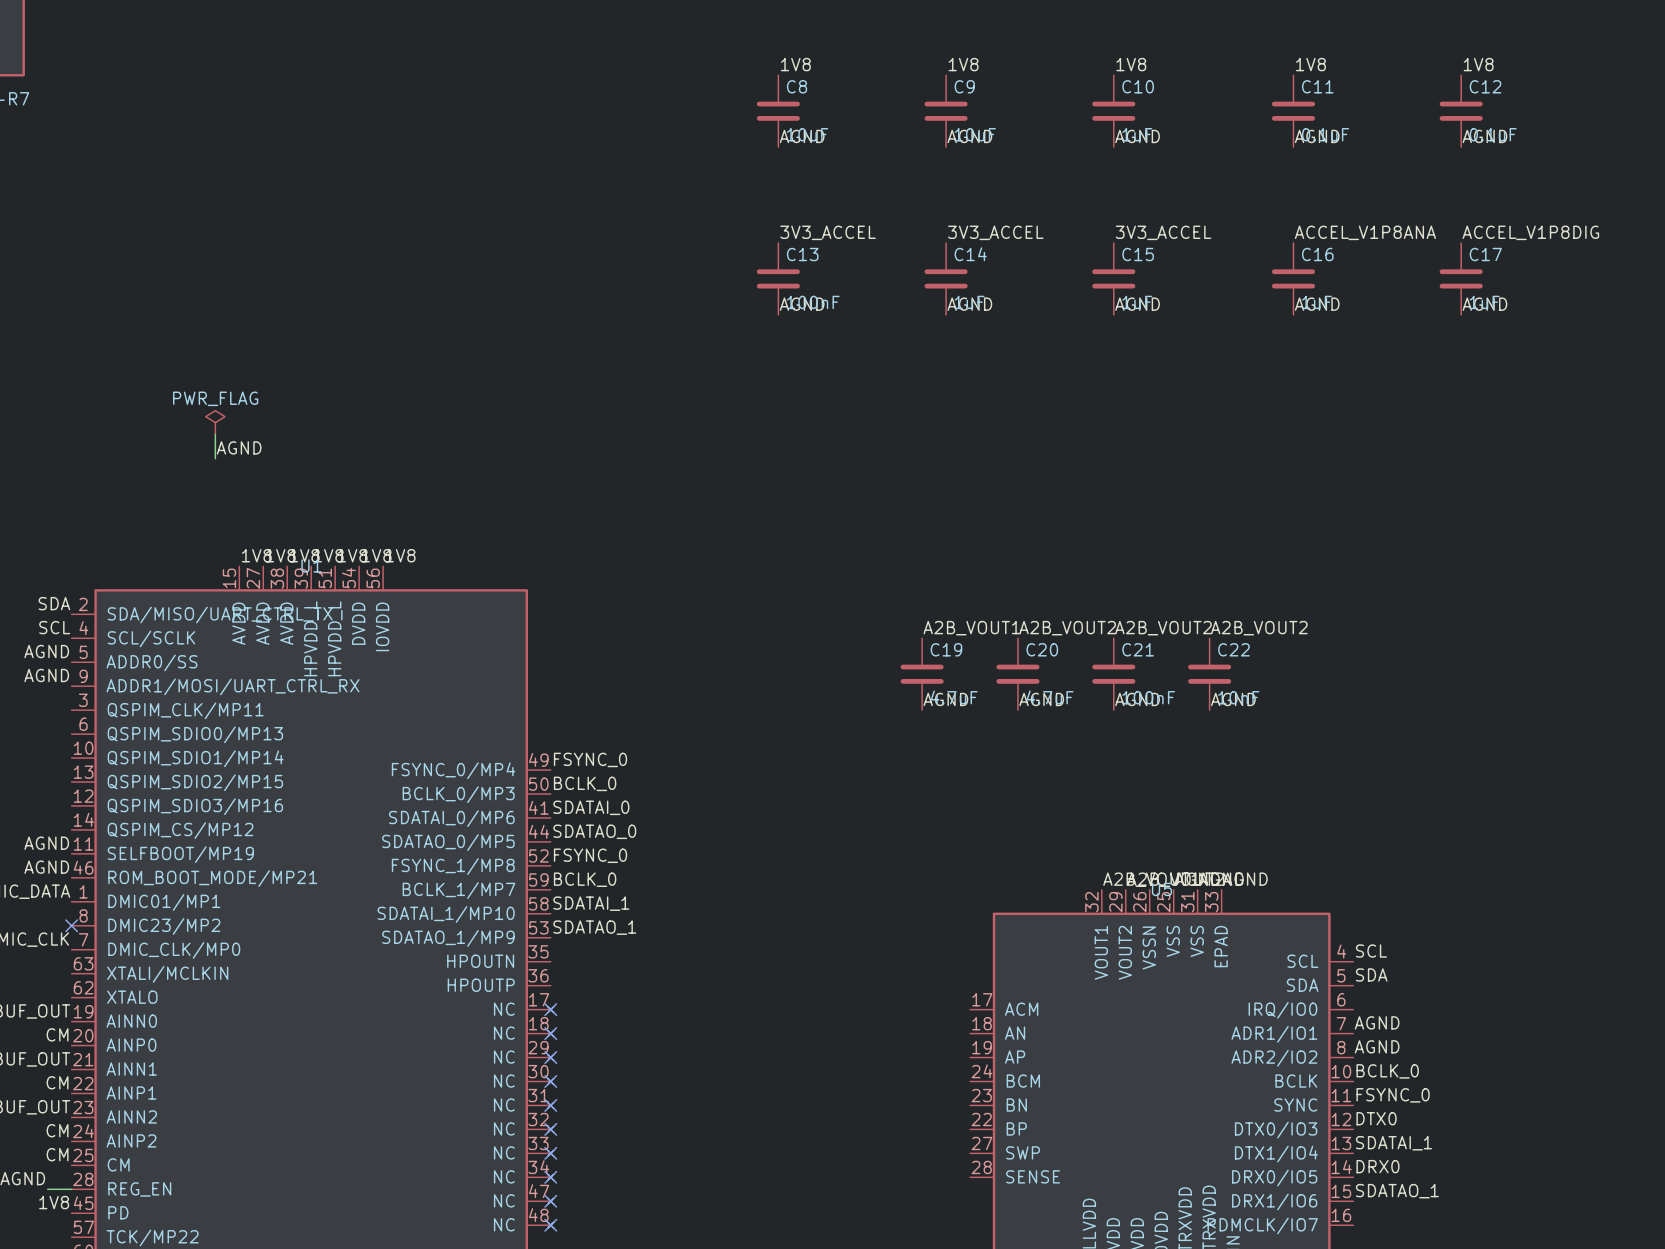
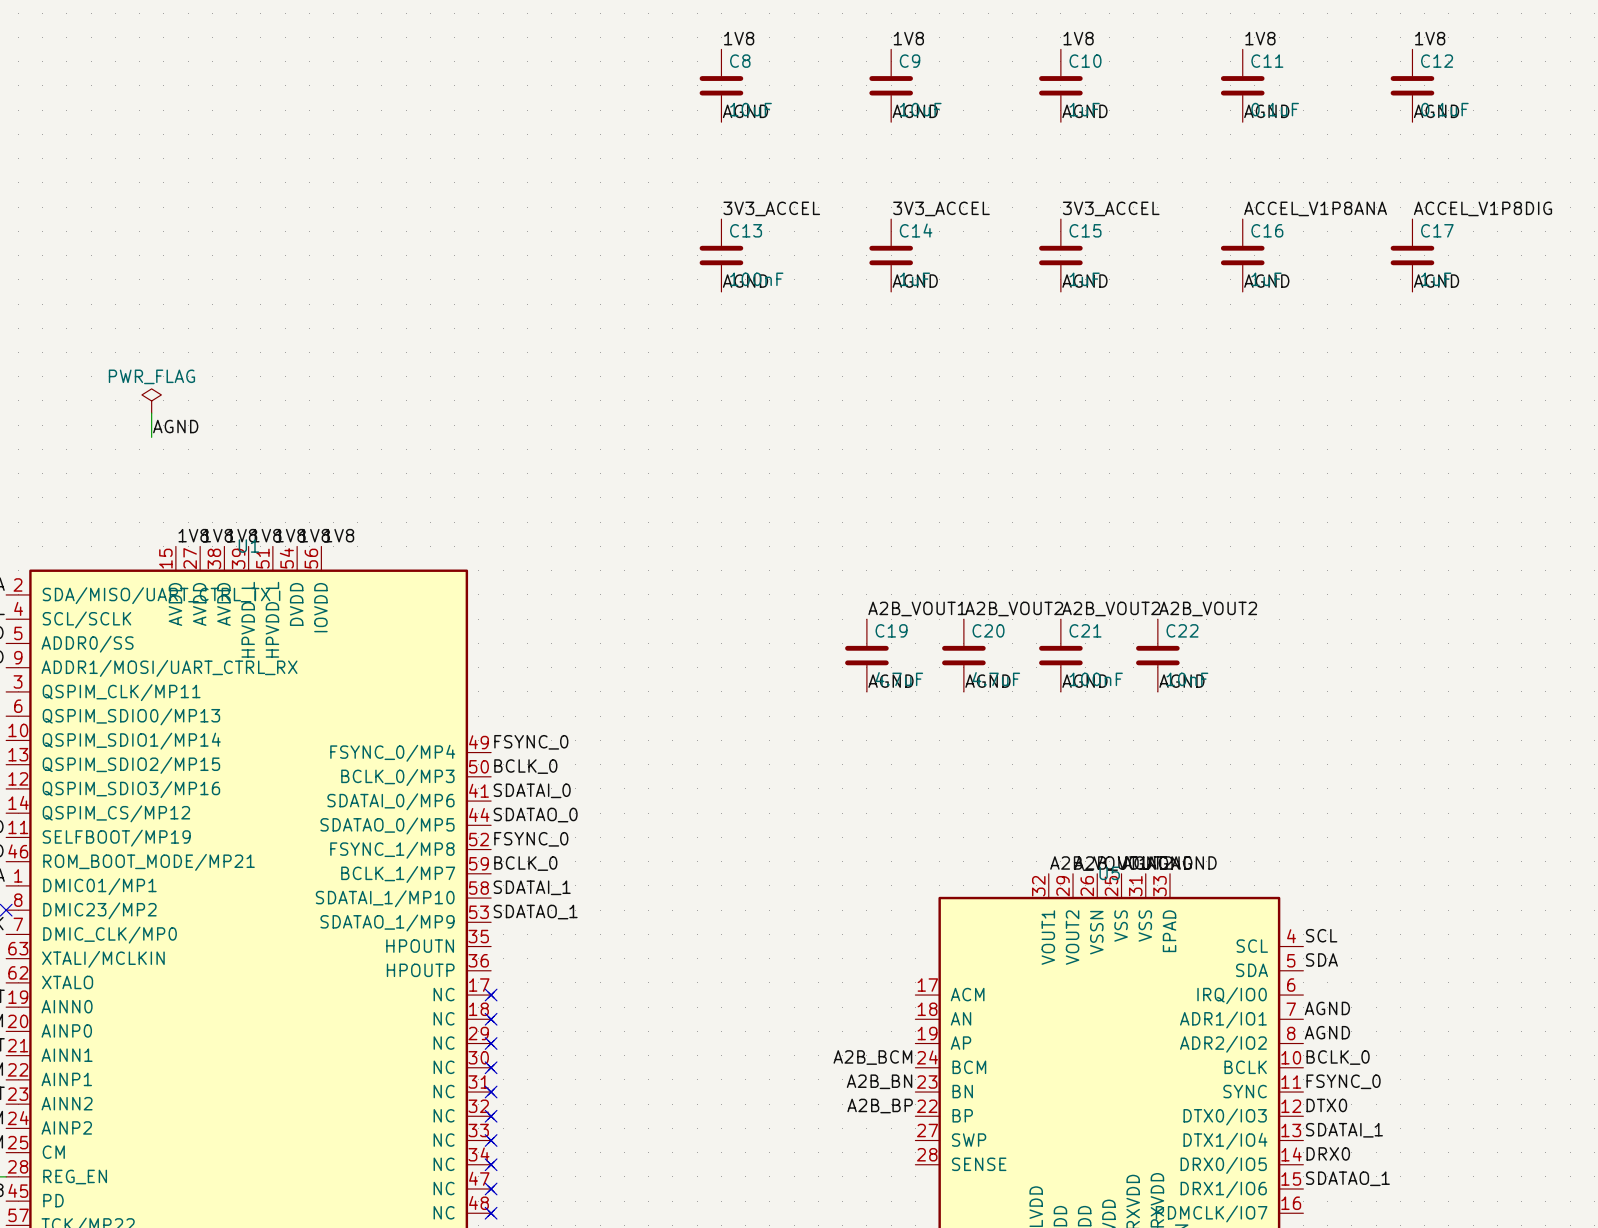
label: none -> A2B_BCM (872, 1057)
label: none -> A2B_BN (879, 1081)
label: none -> A2B_BP (880, 1106)

